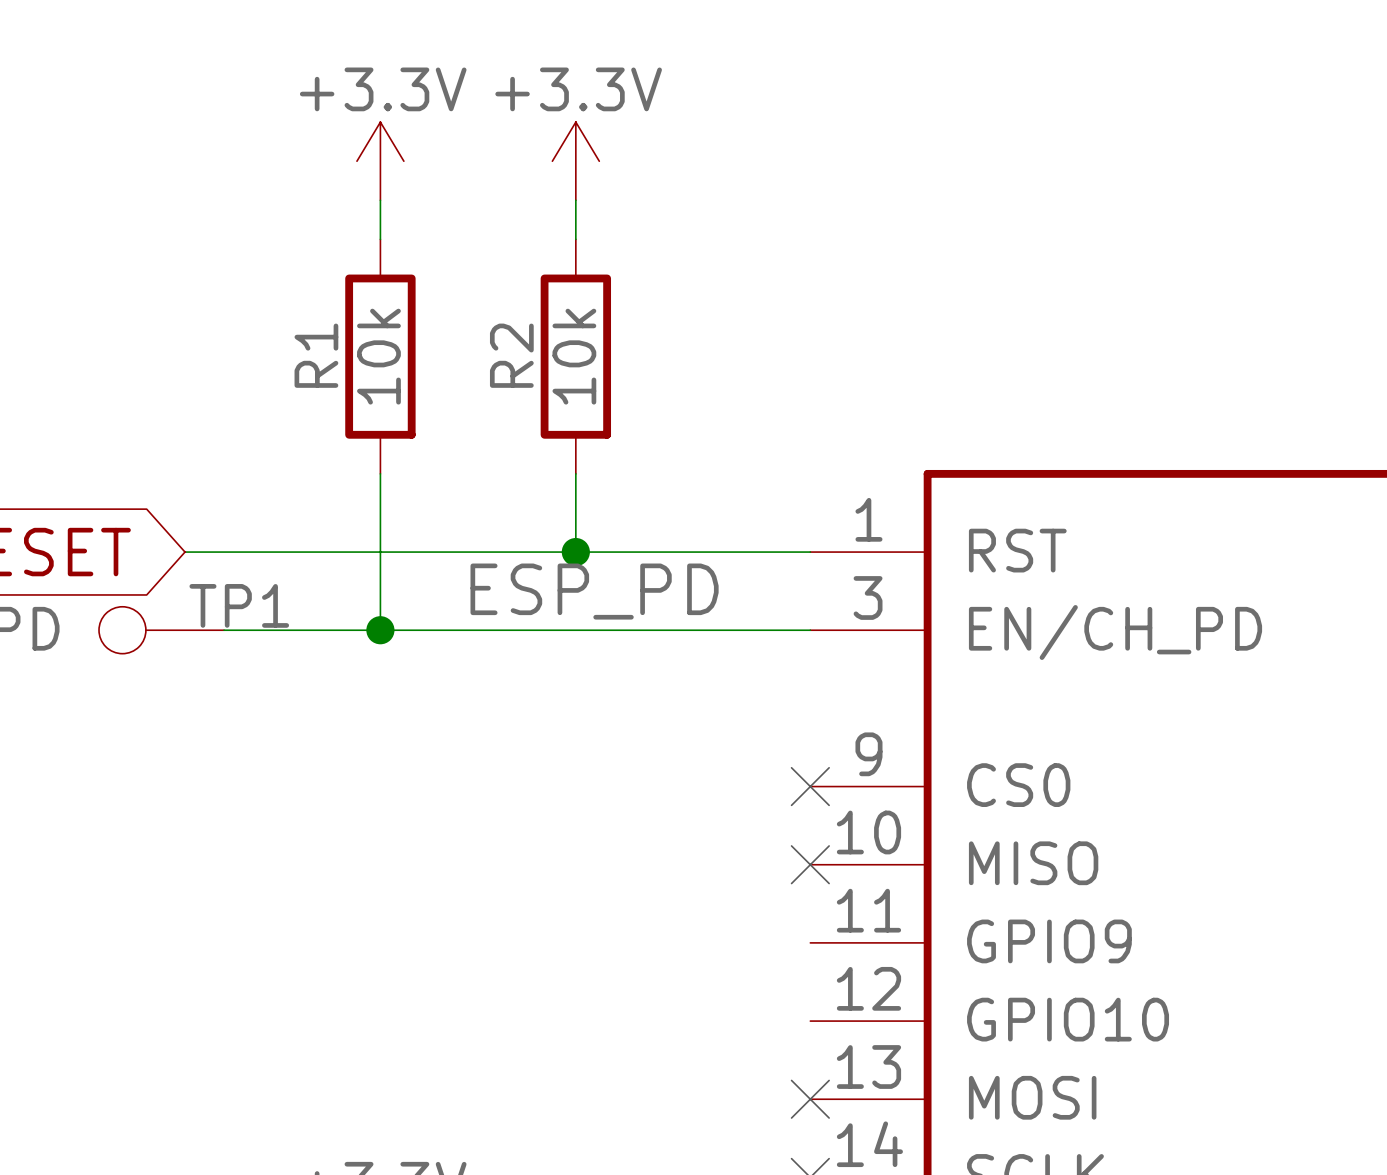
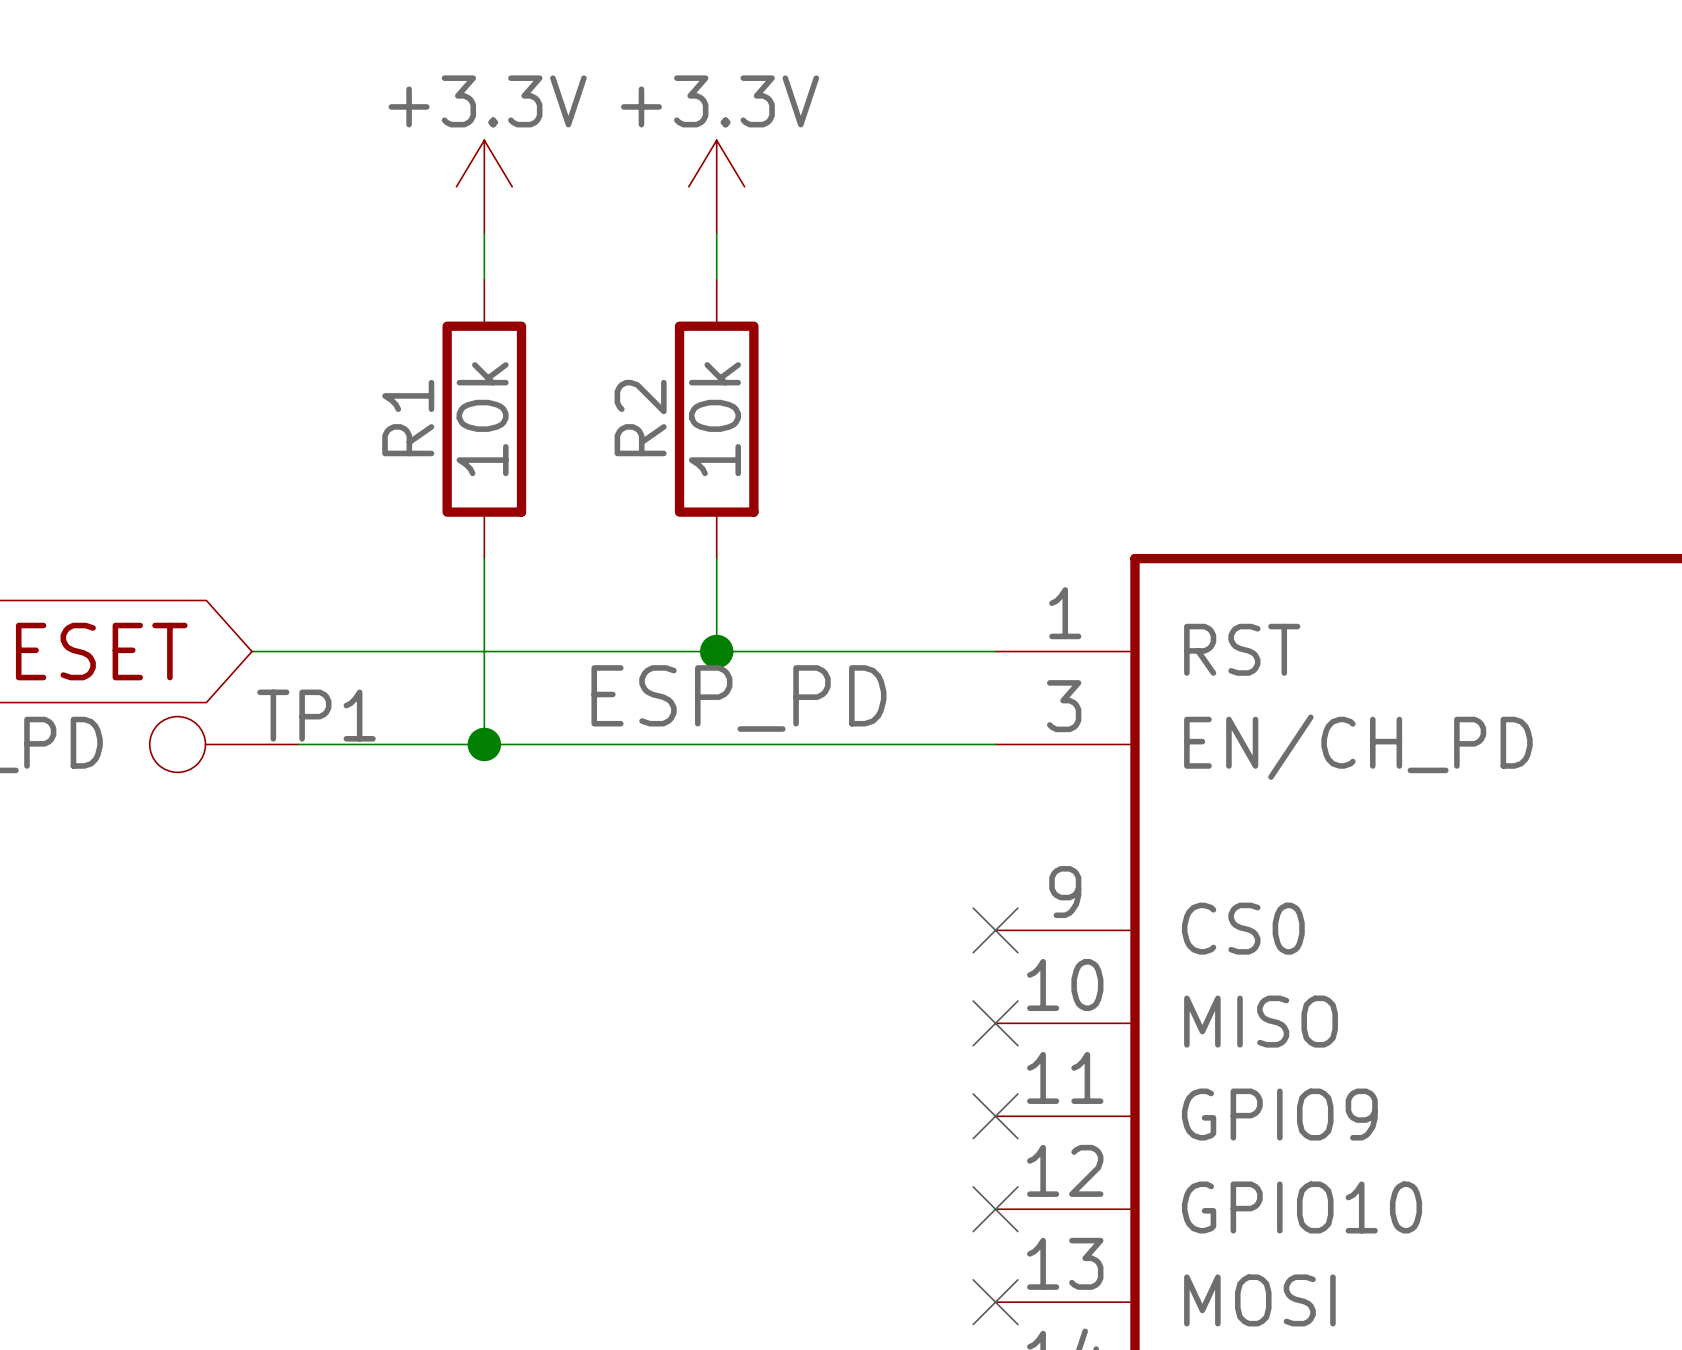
no-connect mark: none -> (995, 1116)
no-connect mark: none -> (995, 1209)

